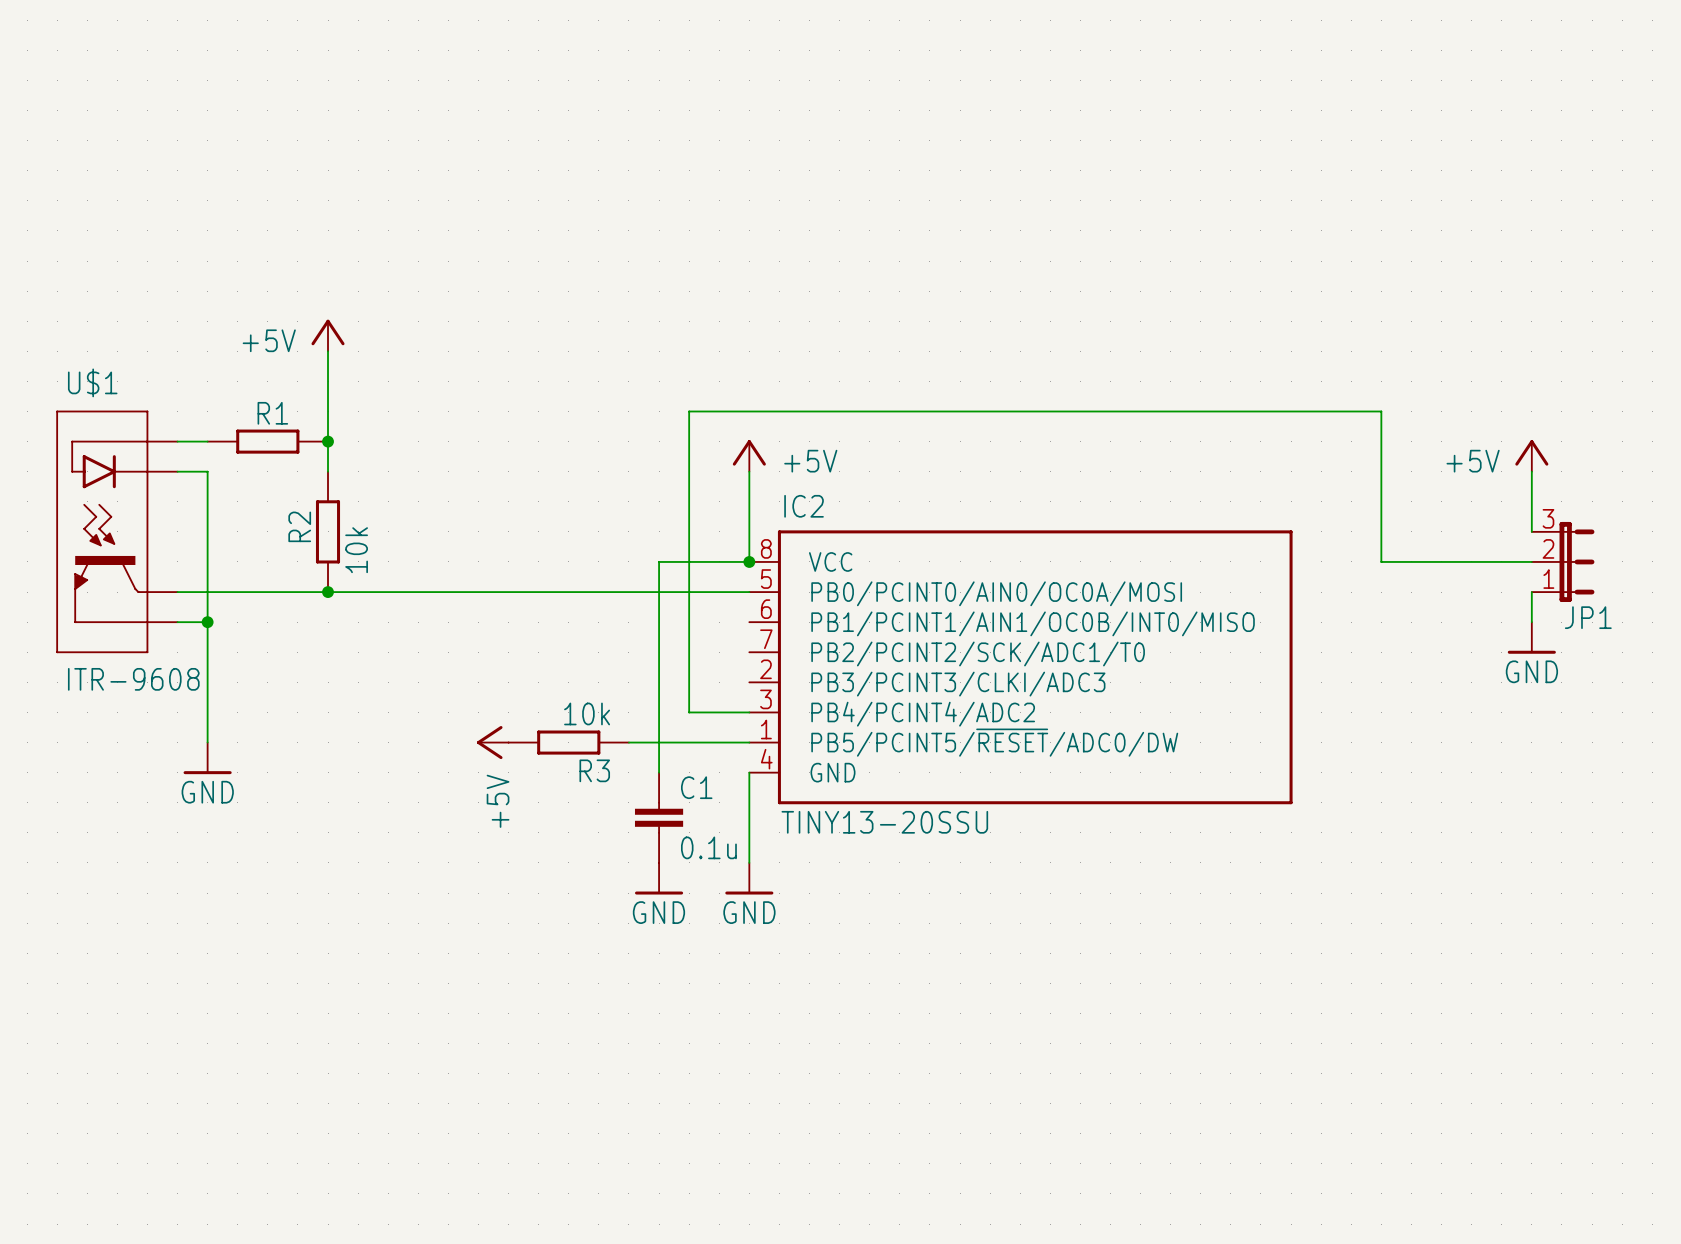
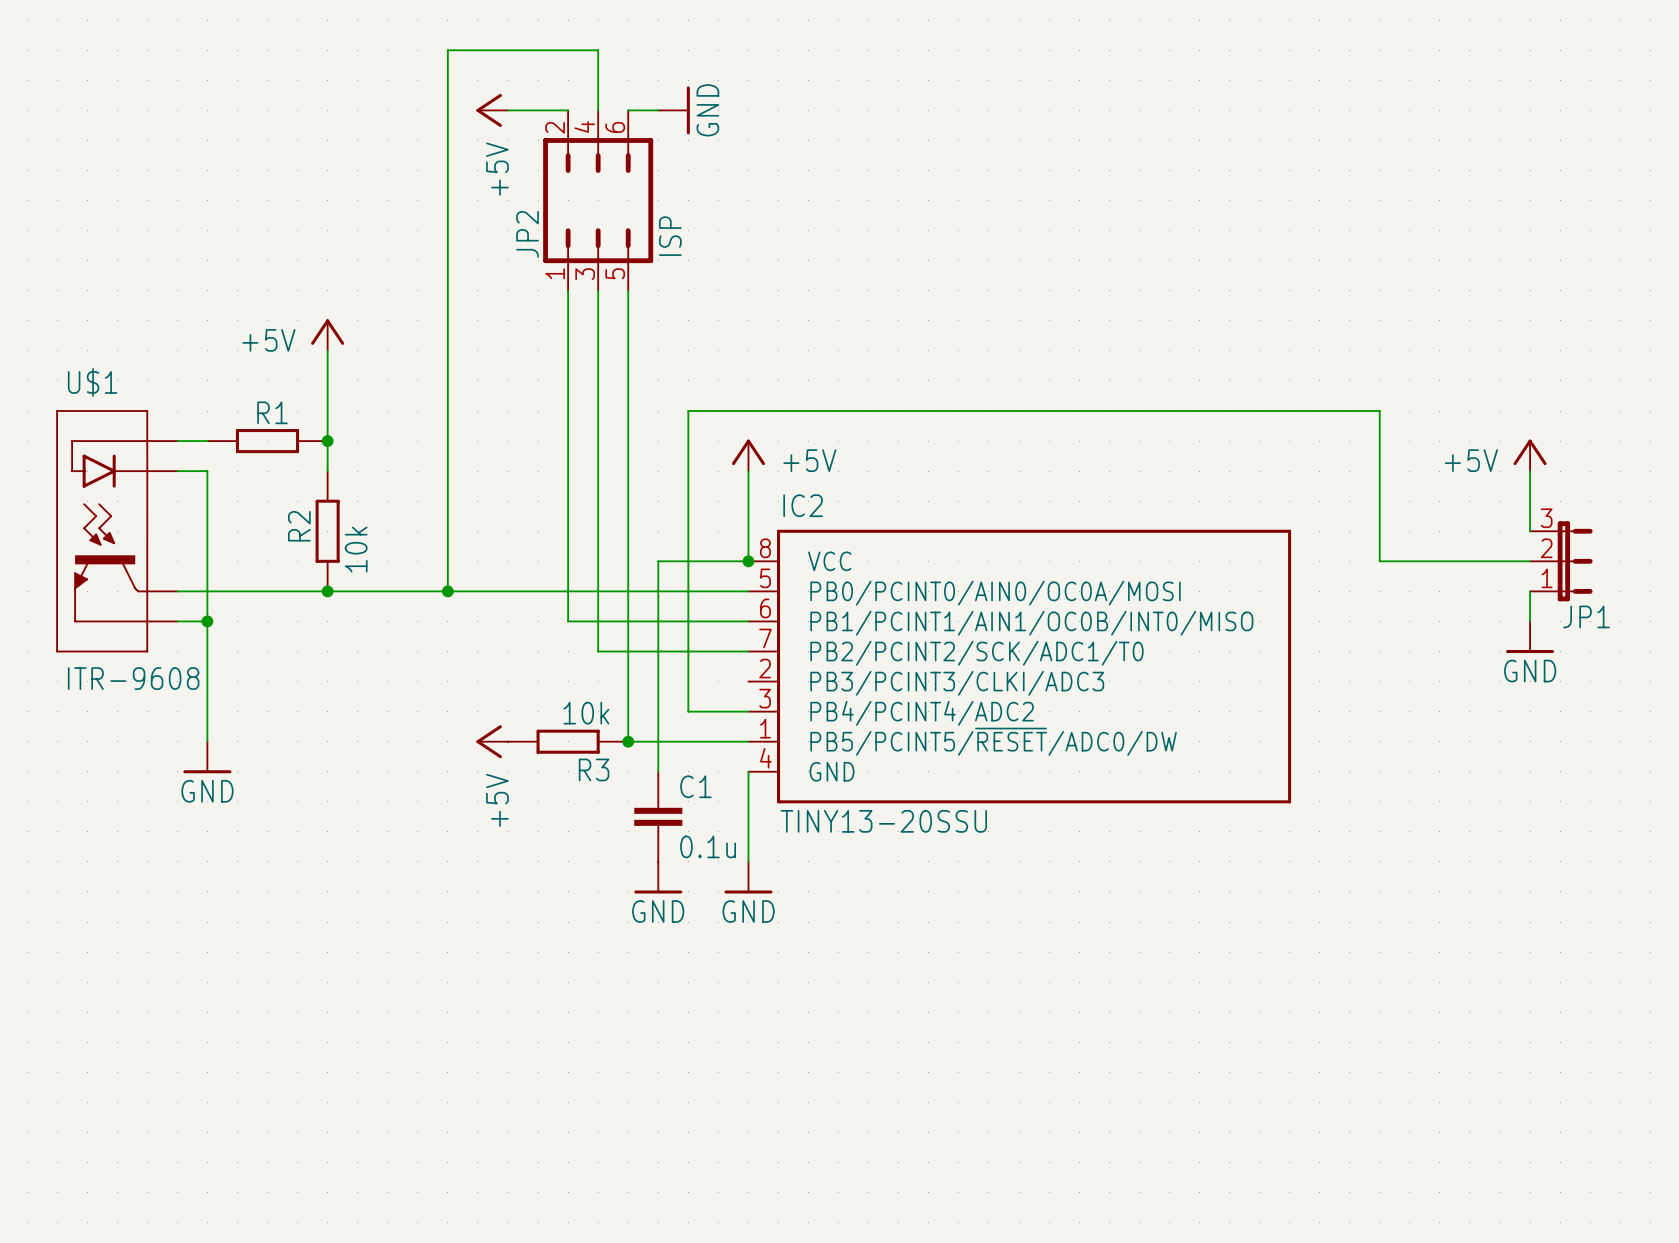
power symbol: none -> +5V (492, 110)
wire: none -> (507, 110) (568, 110)
wire: none -> (598, 110) (598, 50) (447, 50) (447, 591)
wire: none -> (628, 110) (658, 110)
power symbol: none -> GND (674, 110)
JP2: none -> ISP (598, 200)
wire: none -> (568, 290) (568, 621) (748, 621)
wire: none -> (598, 290) (598, 651) (748, 651)
wire: none -> (628, 290) (628, 741)
junction: none -> (447, 591)
junction: none -> (628, 741)

